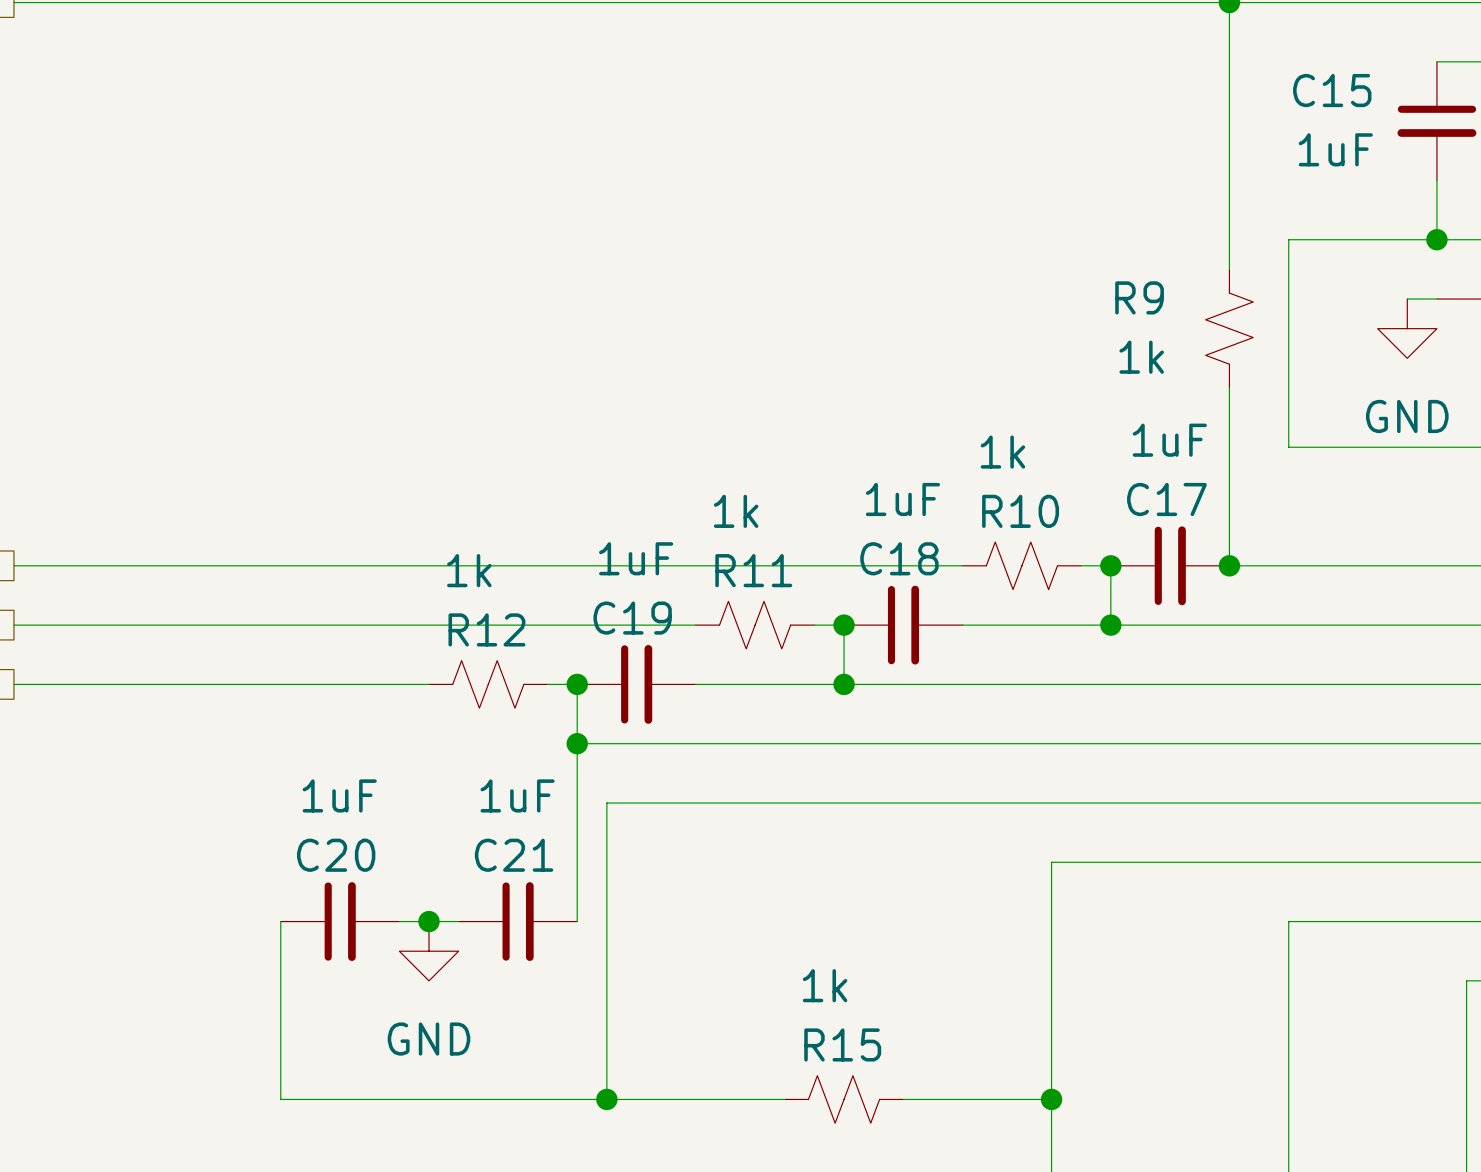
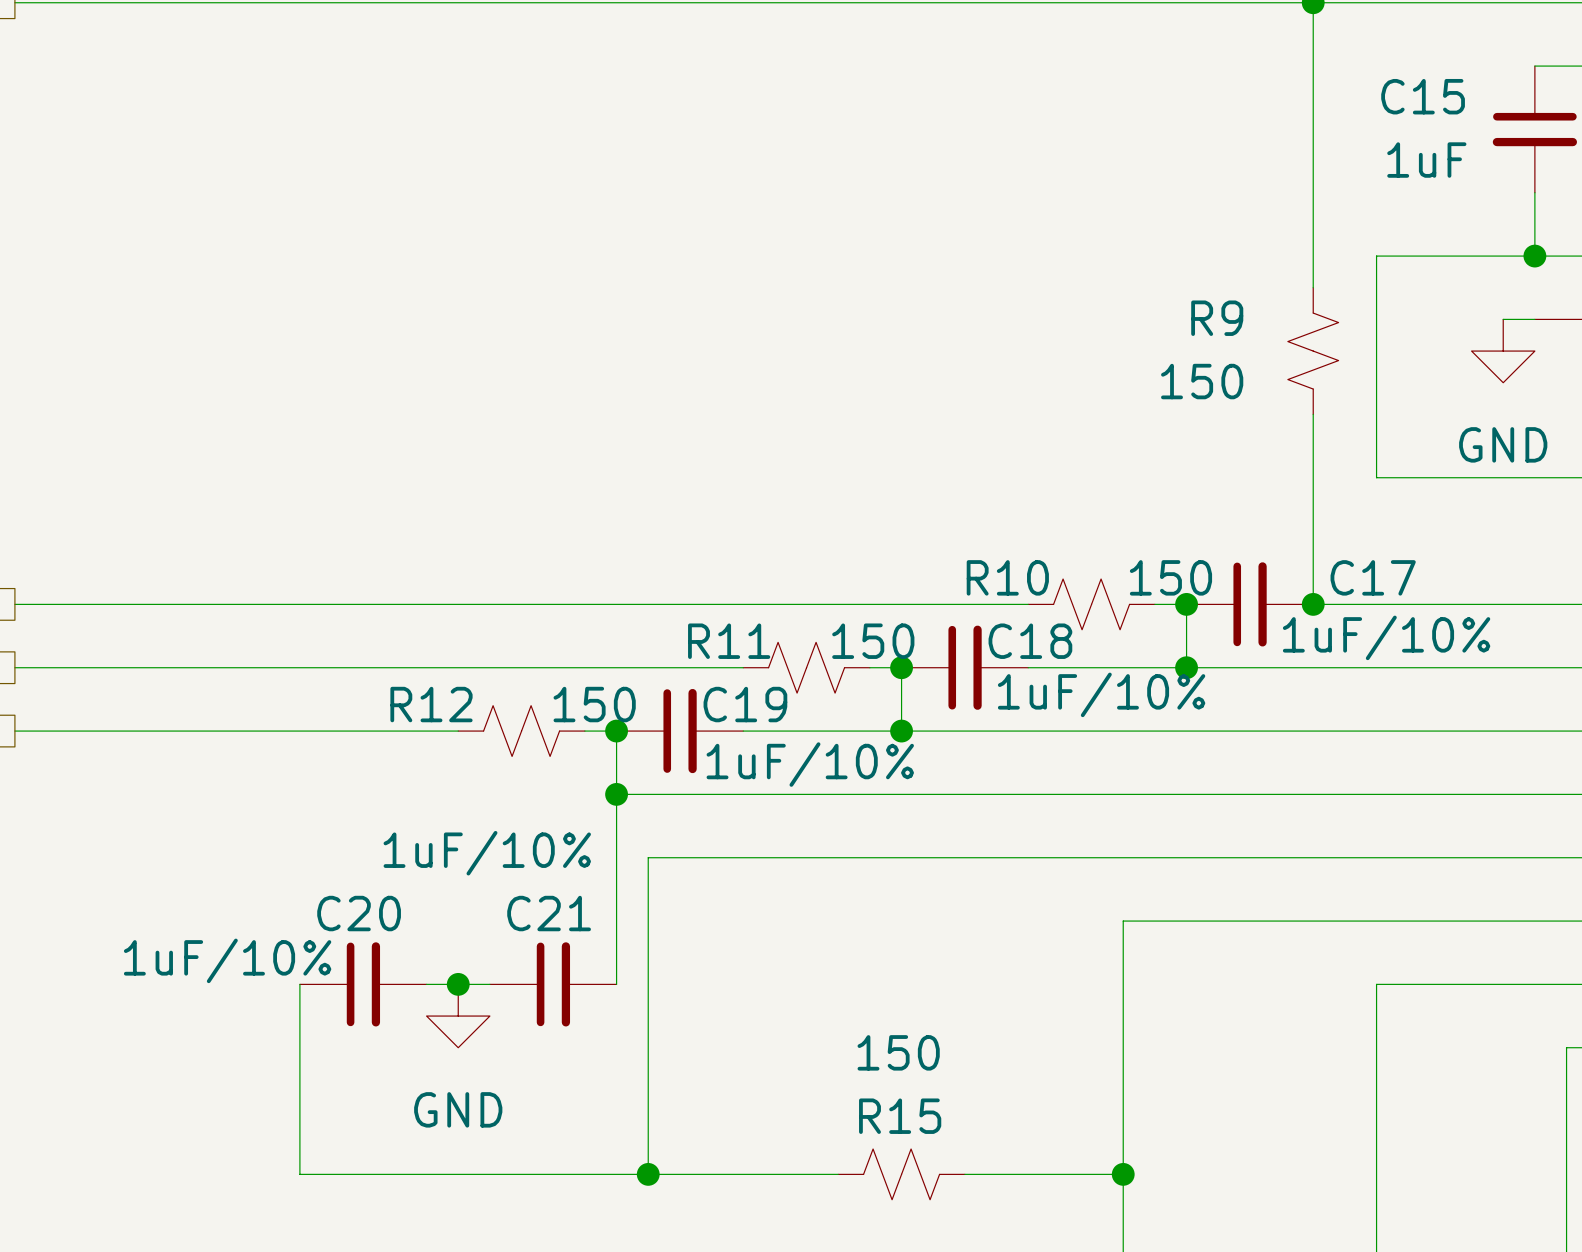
R9 value: 1k (1141, 357) -> 150 (1202, 381)
C17 value: 1uF (1169, 440) -> 1uF/10% (1386, 637)
R10 value: 1k (1002, 452) -> 150 (1170, 577)
C18 value: 1uF (902, 499) -> 1uF/10% (1101, 694)
C17 name position: C17 (1166, 499) -> C17 (1373, 577)
R11 value: 1k (736, 511) -> 150 (873, 641)
R10 name position: R10 (1020, 511) -> R10 (1007, 577)
C19 value: 1uF (636, 558) -> 1uF/10% (810, 764)
C18 name position: C18 (899, 558) -> C18 (1030, 641)
R12 value: 1k (469, 570) -> 150 (594, 704)
R11 name position: R11 (753, 570) -> R11 (729, 641)
C19 name position: C19 (632, 618) -> C19 (745, 704)
R12 name position: R12 (486, 629) -> R12 (431, 704)
C20 value: 1uF (339, 795) -> 1uF/10% (227, 960)
C21 value: 1uF (517, 795) -> 1uF/10% (487, 853)
R15 value: 1k (825, 985) -> 150 (898, 1052)

